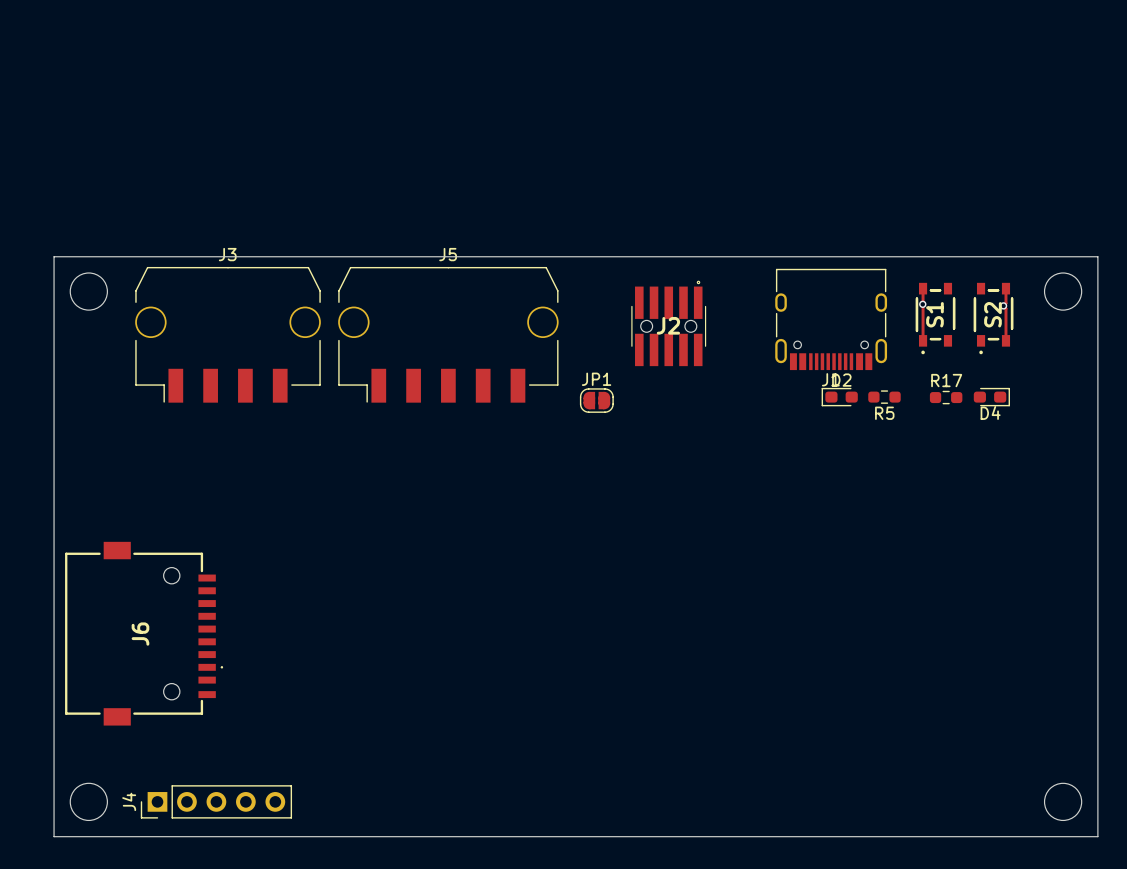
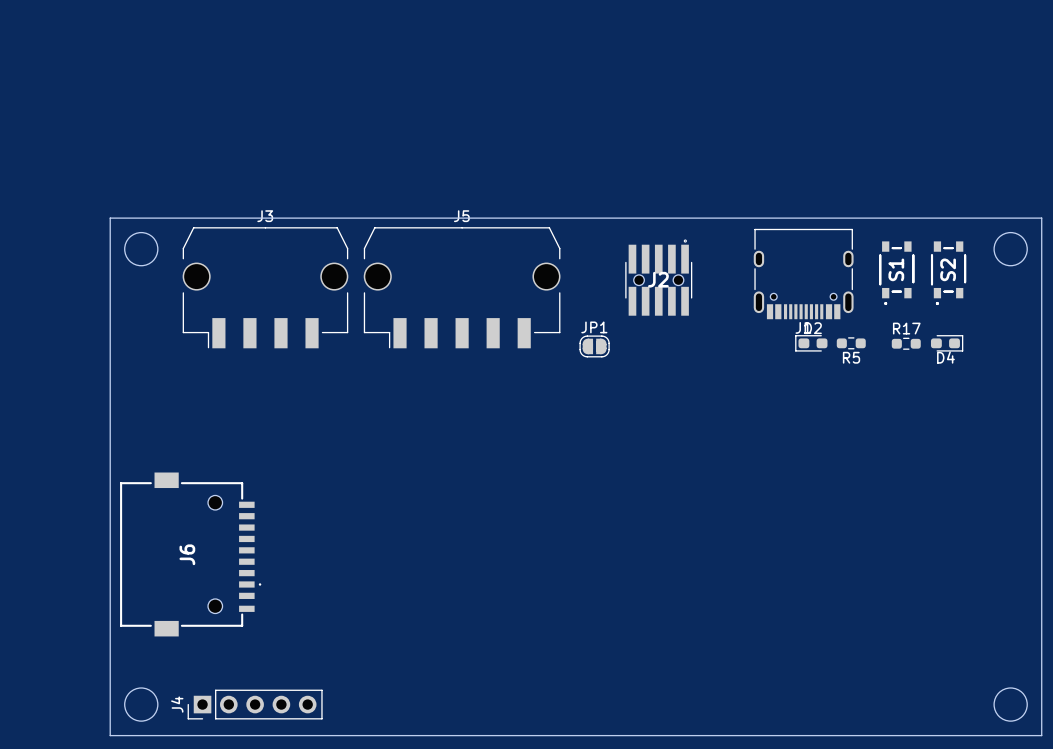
track: (923, 288) (923, 340) -> none
track: (1005, 288) (1005, 303) (1003, 305) (1005, 308) (1005, 340) -> none
via: (922, 304) -> none
via: (1003, 305) -> none

